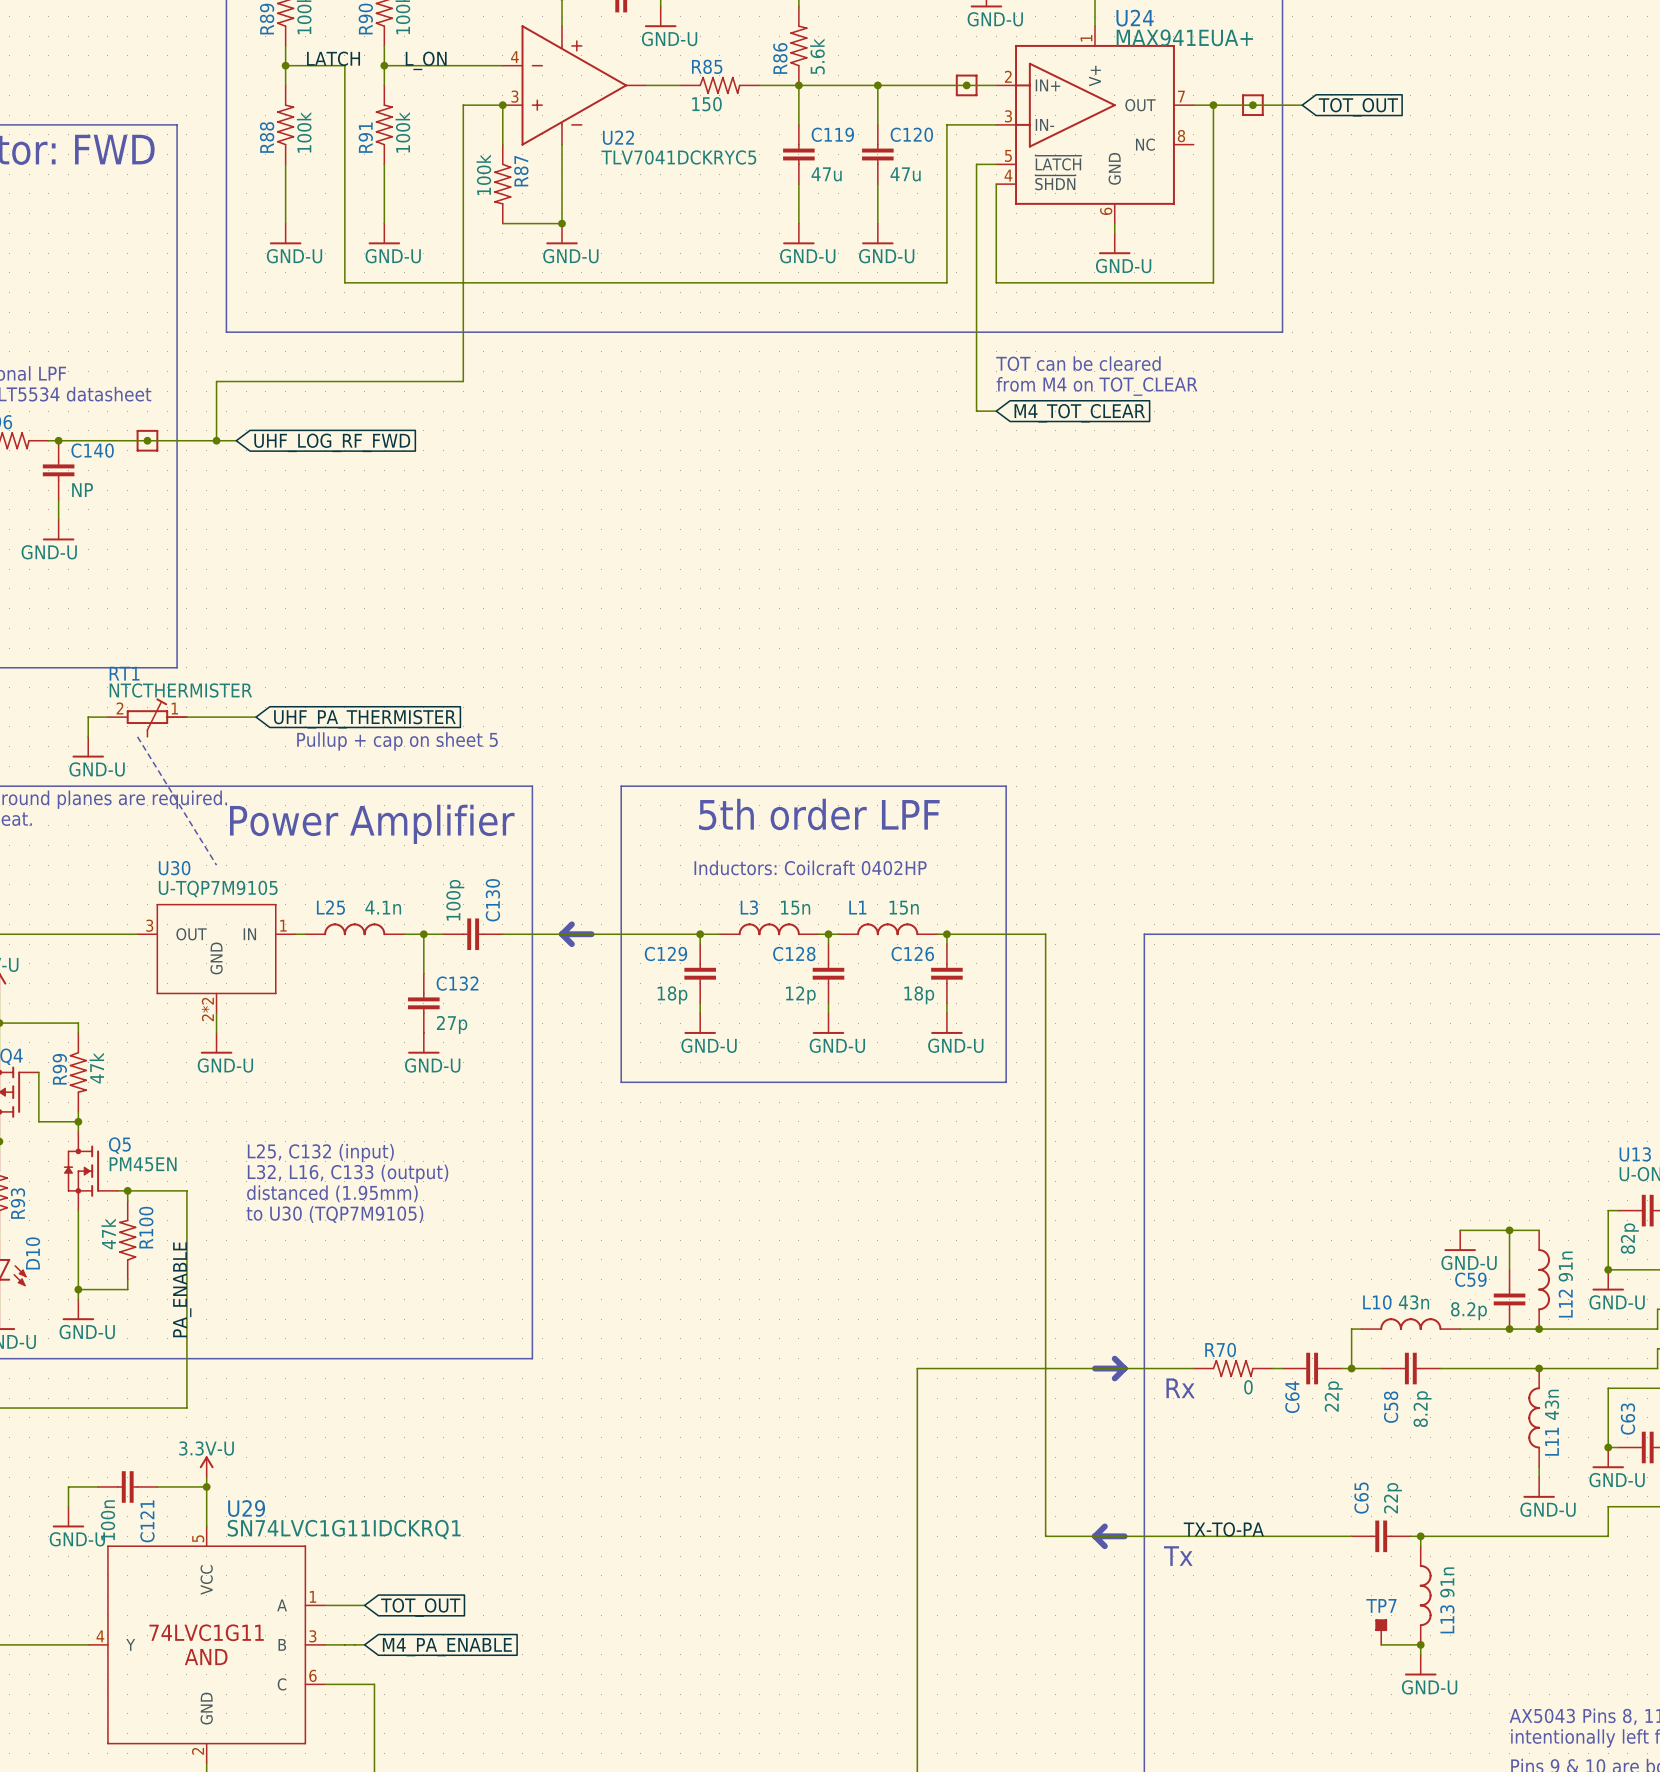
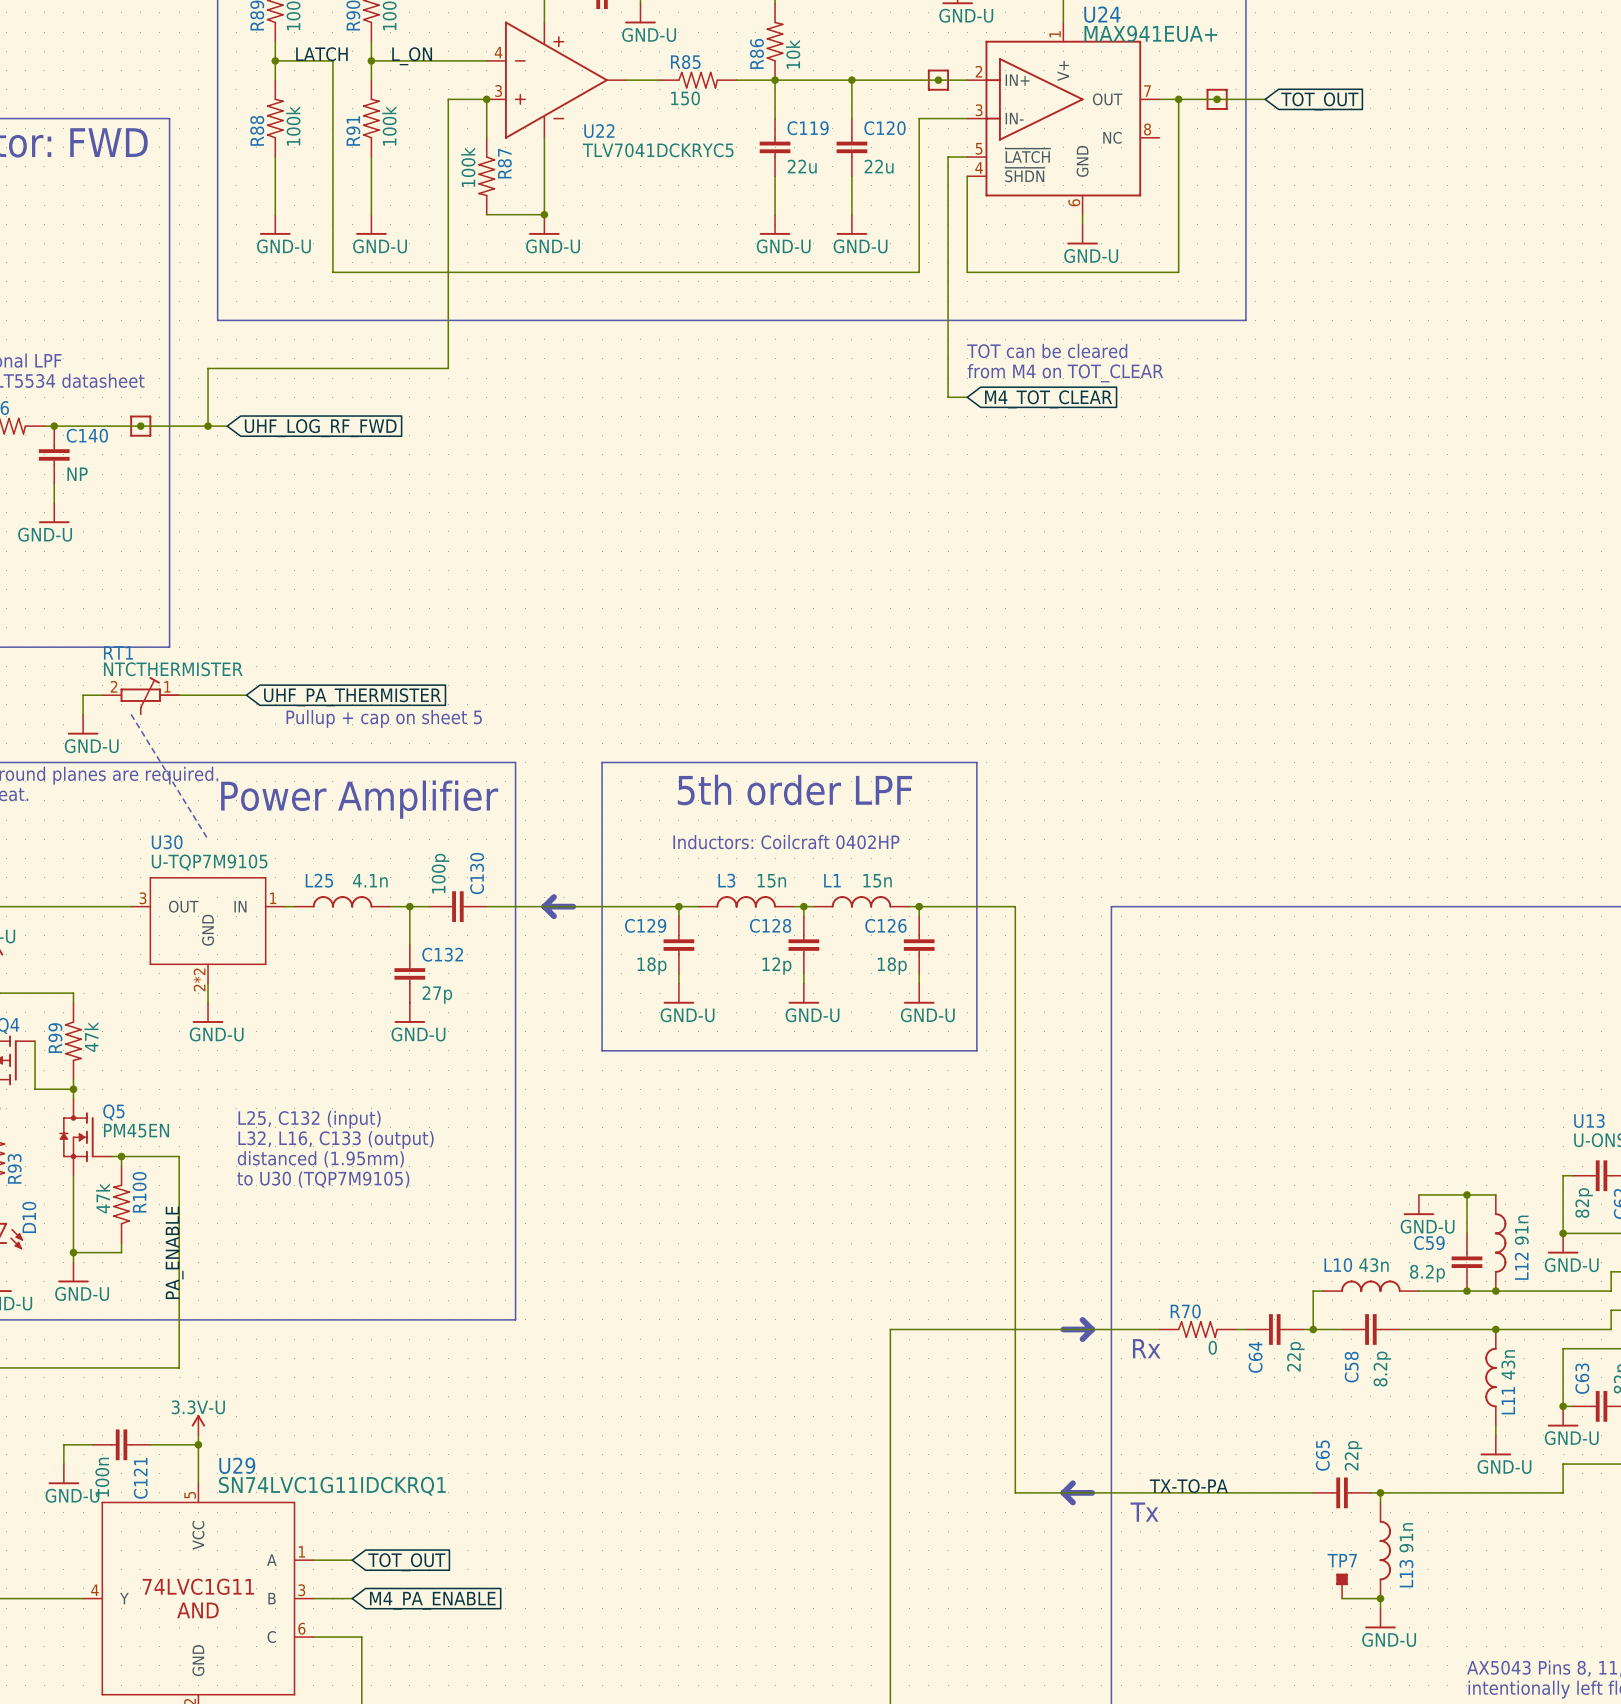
R86 value: 5.6k (817, 56) -> 10k (793, 54)
C119 value: 47u (826, 174) -> 22u (802, 166)
C120 value: 47u (905, 174) -> 22u (879, 166)

